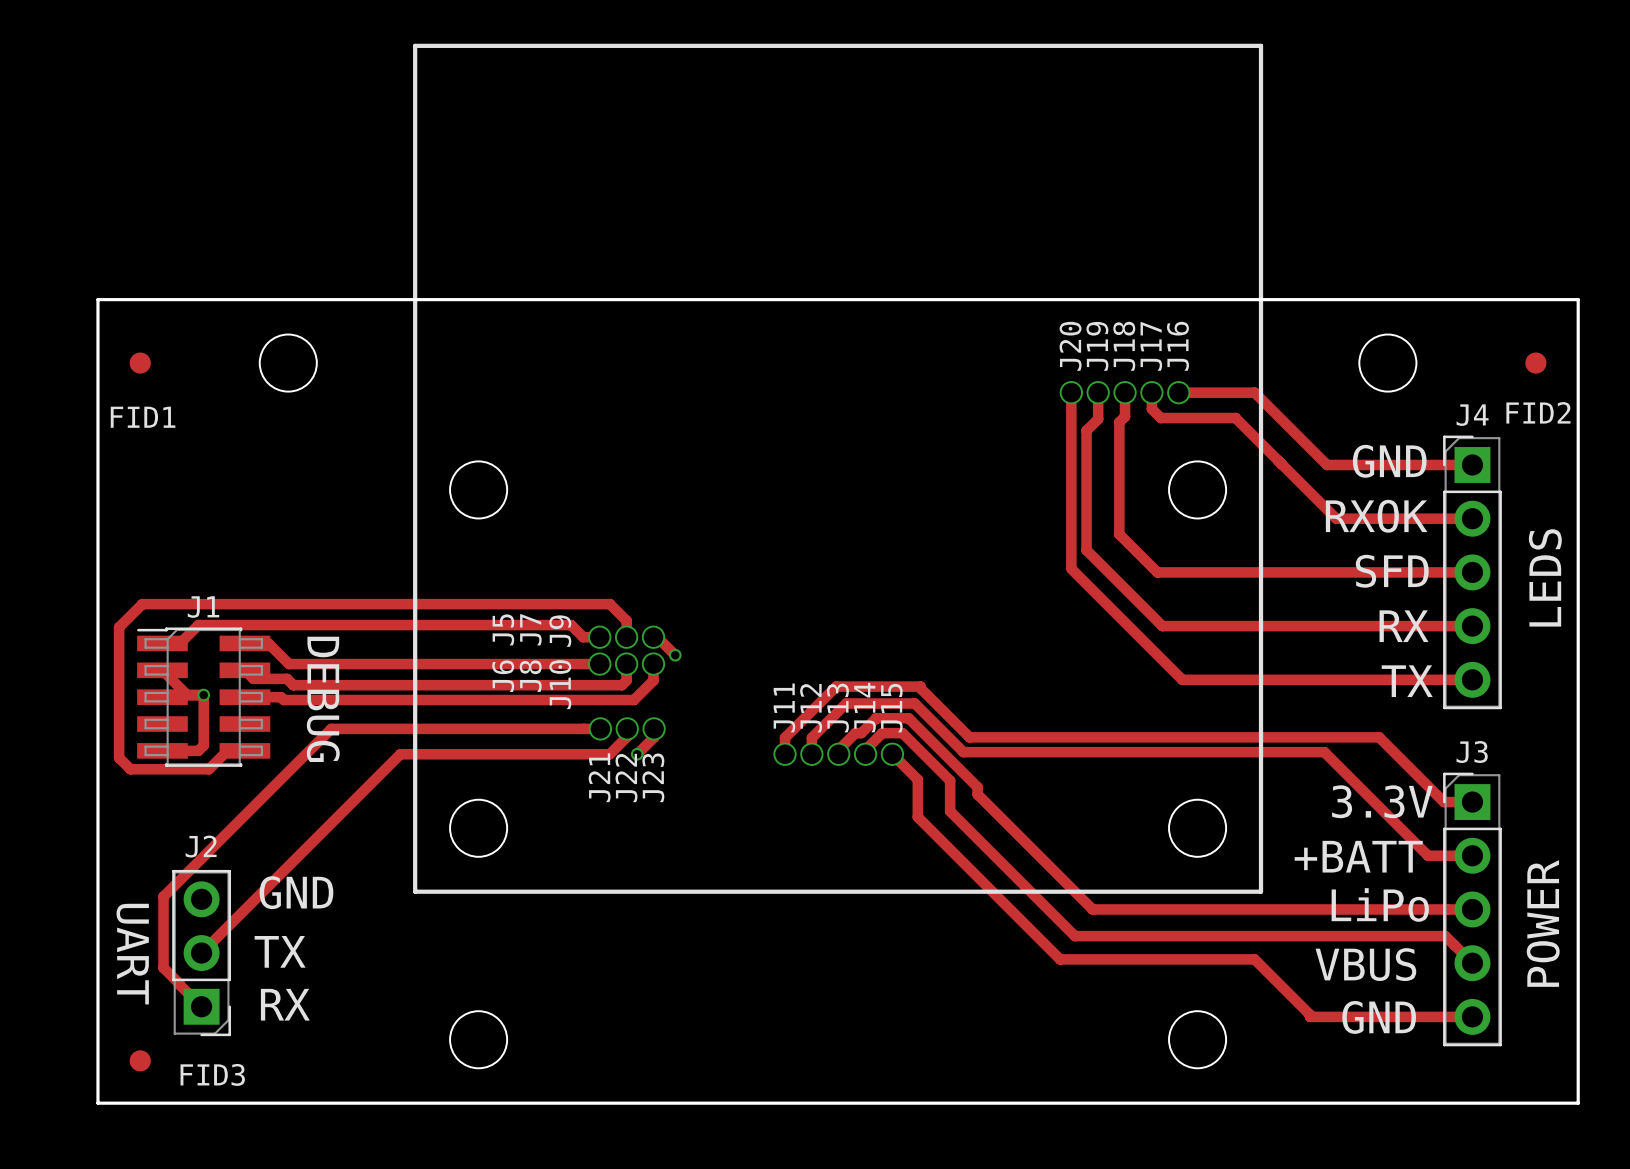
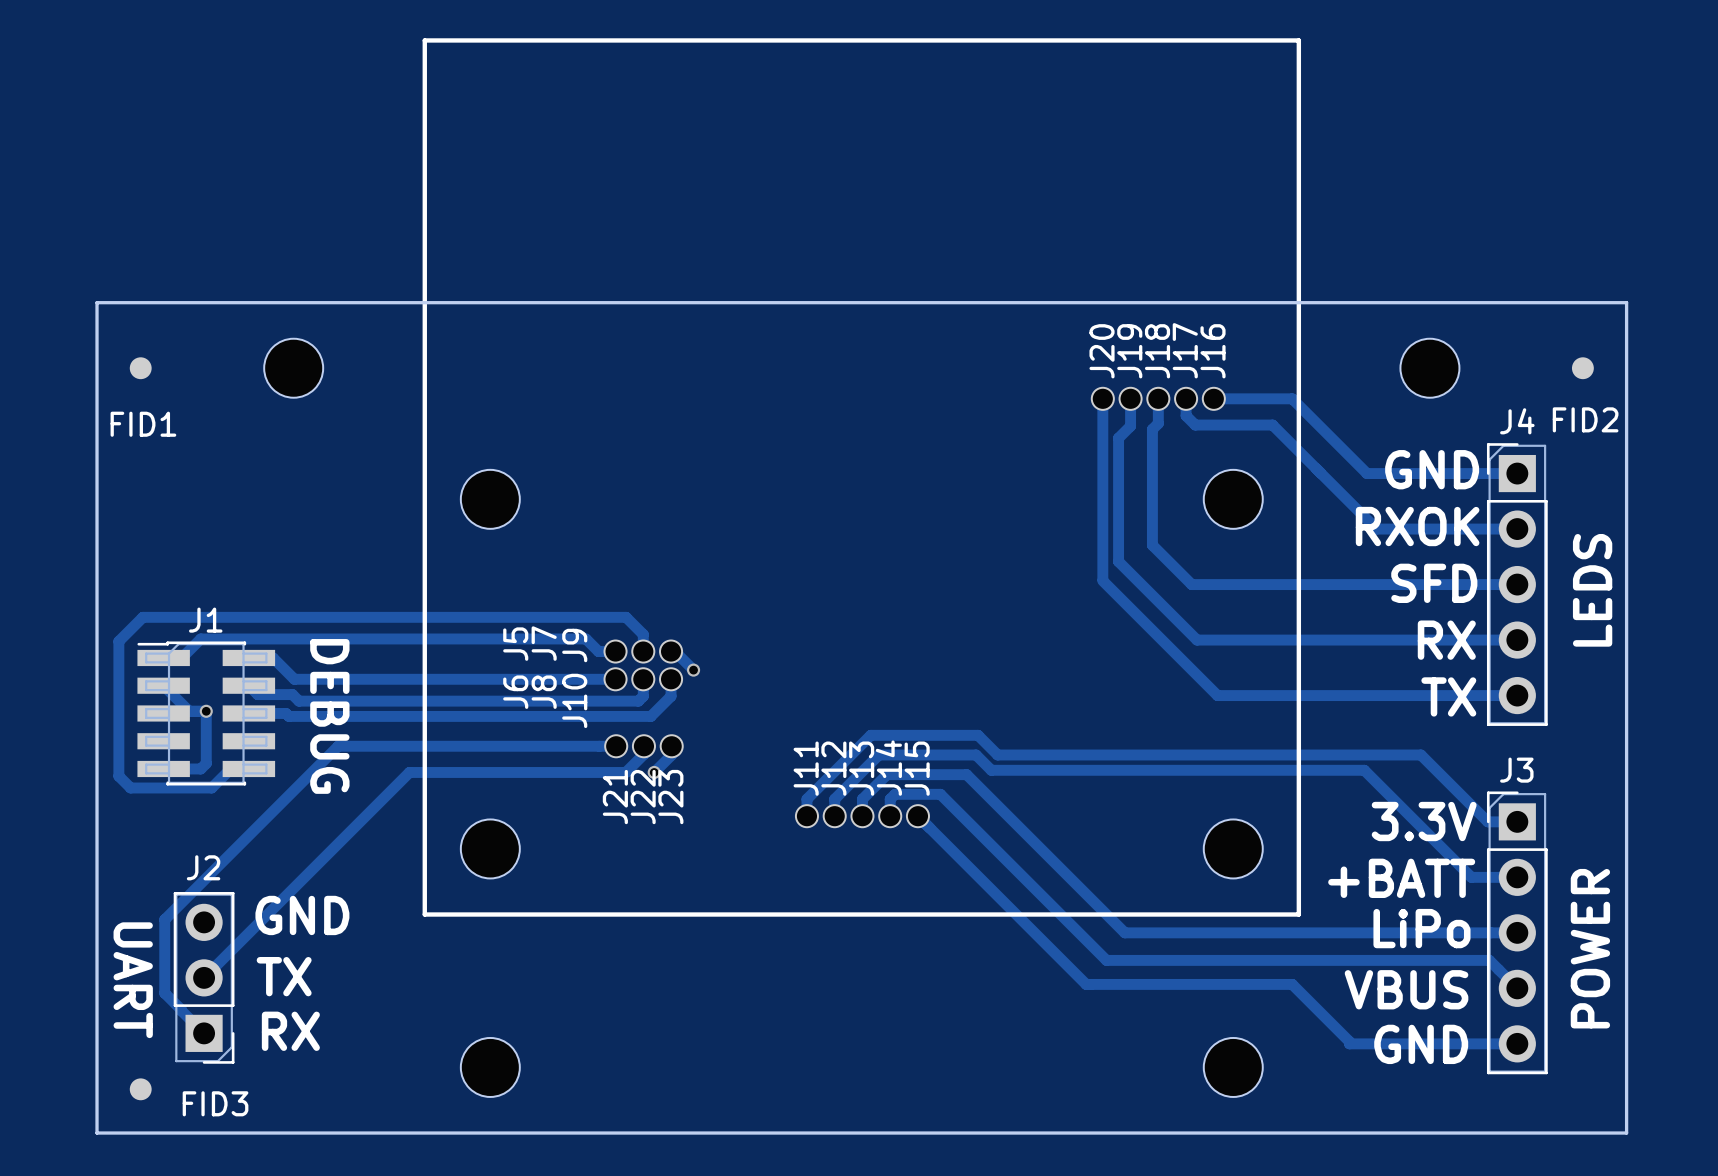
track: (876, 718) (861, 733) (855, 733) (838, 749) (838, 754) -> (901, 735) (870, 735) (806, 799) (806, 816)
track: (908, 718) (977, 787) (977, 794) -> (934, 735) (978, 735)
track: (950, 718) (920, 686) (836, 686) (785, 737) (785, 754) -> none
track: (948, 737) (914, 703) (846, 703) (811, 737) (811, 754) -> (976, 755) (878, 755) (834, 799) (834, 816)
J11 position: (785, 754) -> (806, 816)
J12 position: (811, 754) -> (834, 816)
J13 position: (838, 754) -> (862, 816)
track: (865, 754) (865, 749) (882, 733) (902, 733) (950, 780) (950, 811) -> (890, 816) (890, 799) (895, 794) (940, 794) (977, 831)
J14 position: (865, 754) -> (890, 816)
track: (892, 754) (917, 779) (917, 817) (1060, 959) -> (917, 816) (1086, 984) (1091, 984)
J15 position: (892, 754) -> (917, 816)
track: none -> (1006, 813) (966, 774) (886, 774) (862, 799) (862, 816)

